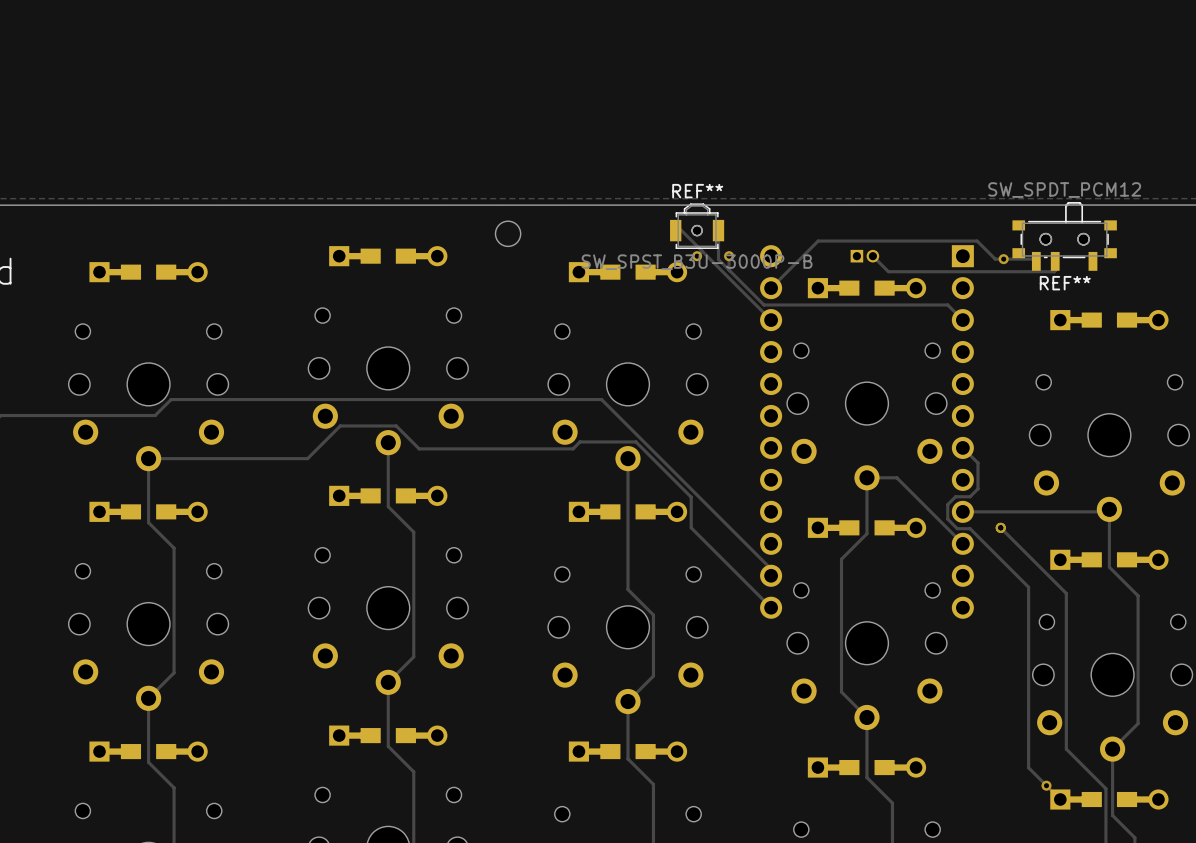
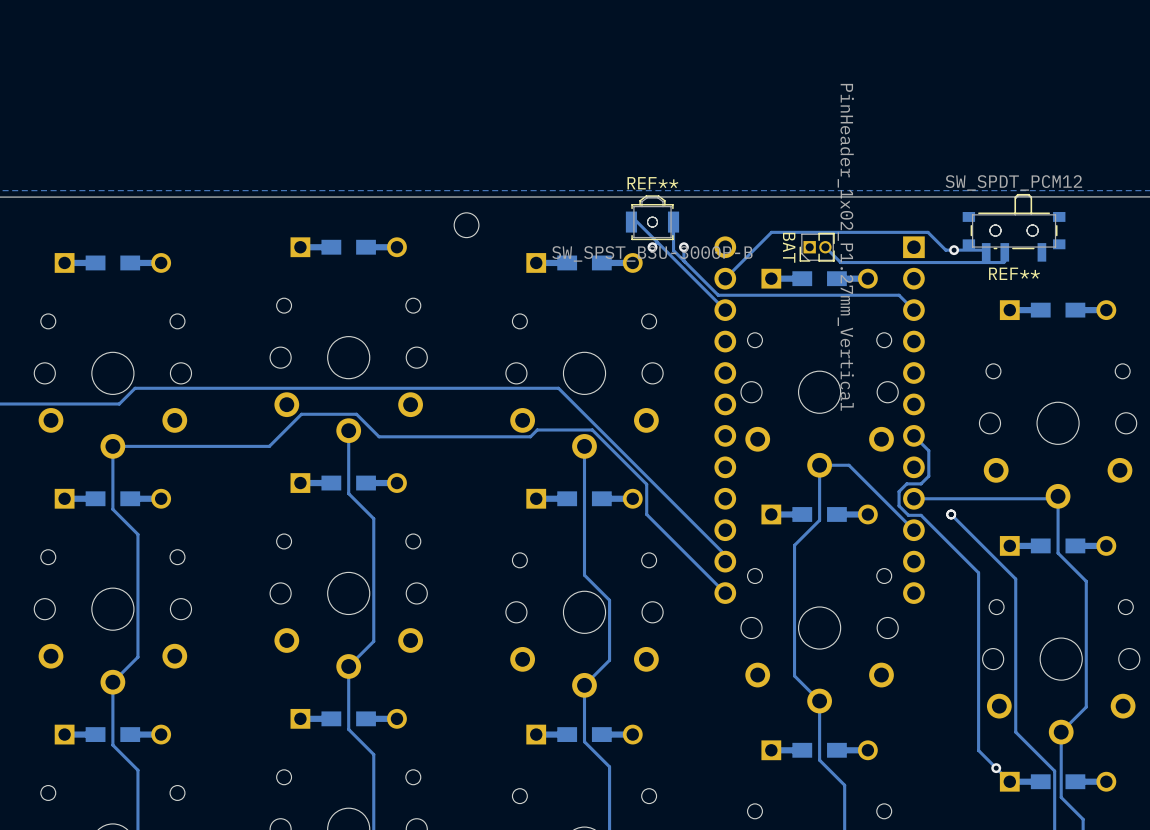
BAT side: top (864, 256) -> bottom (817, 247)

